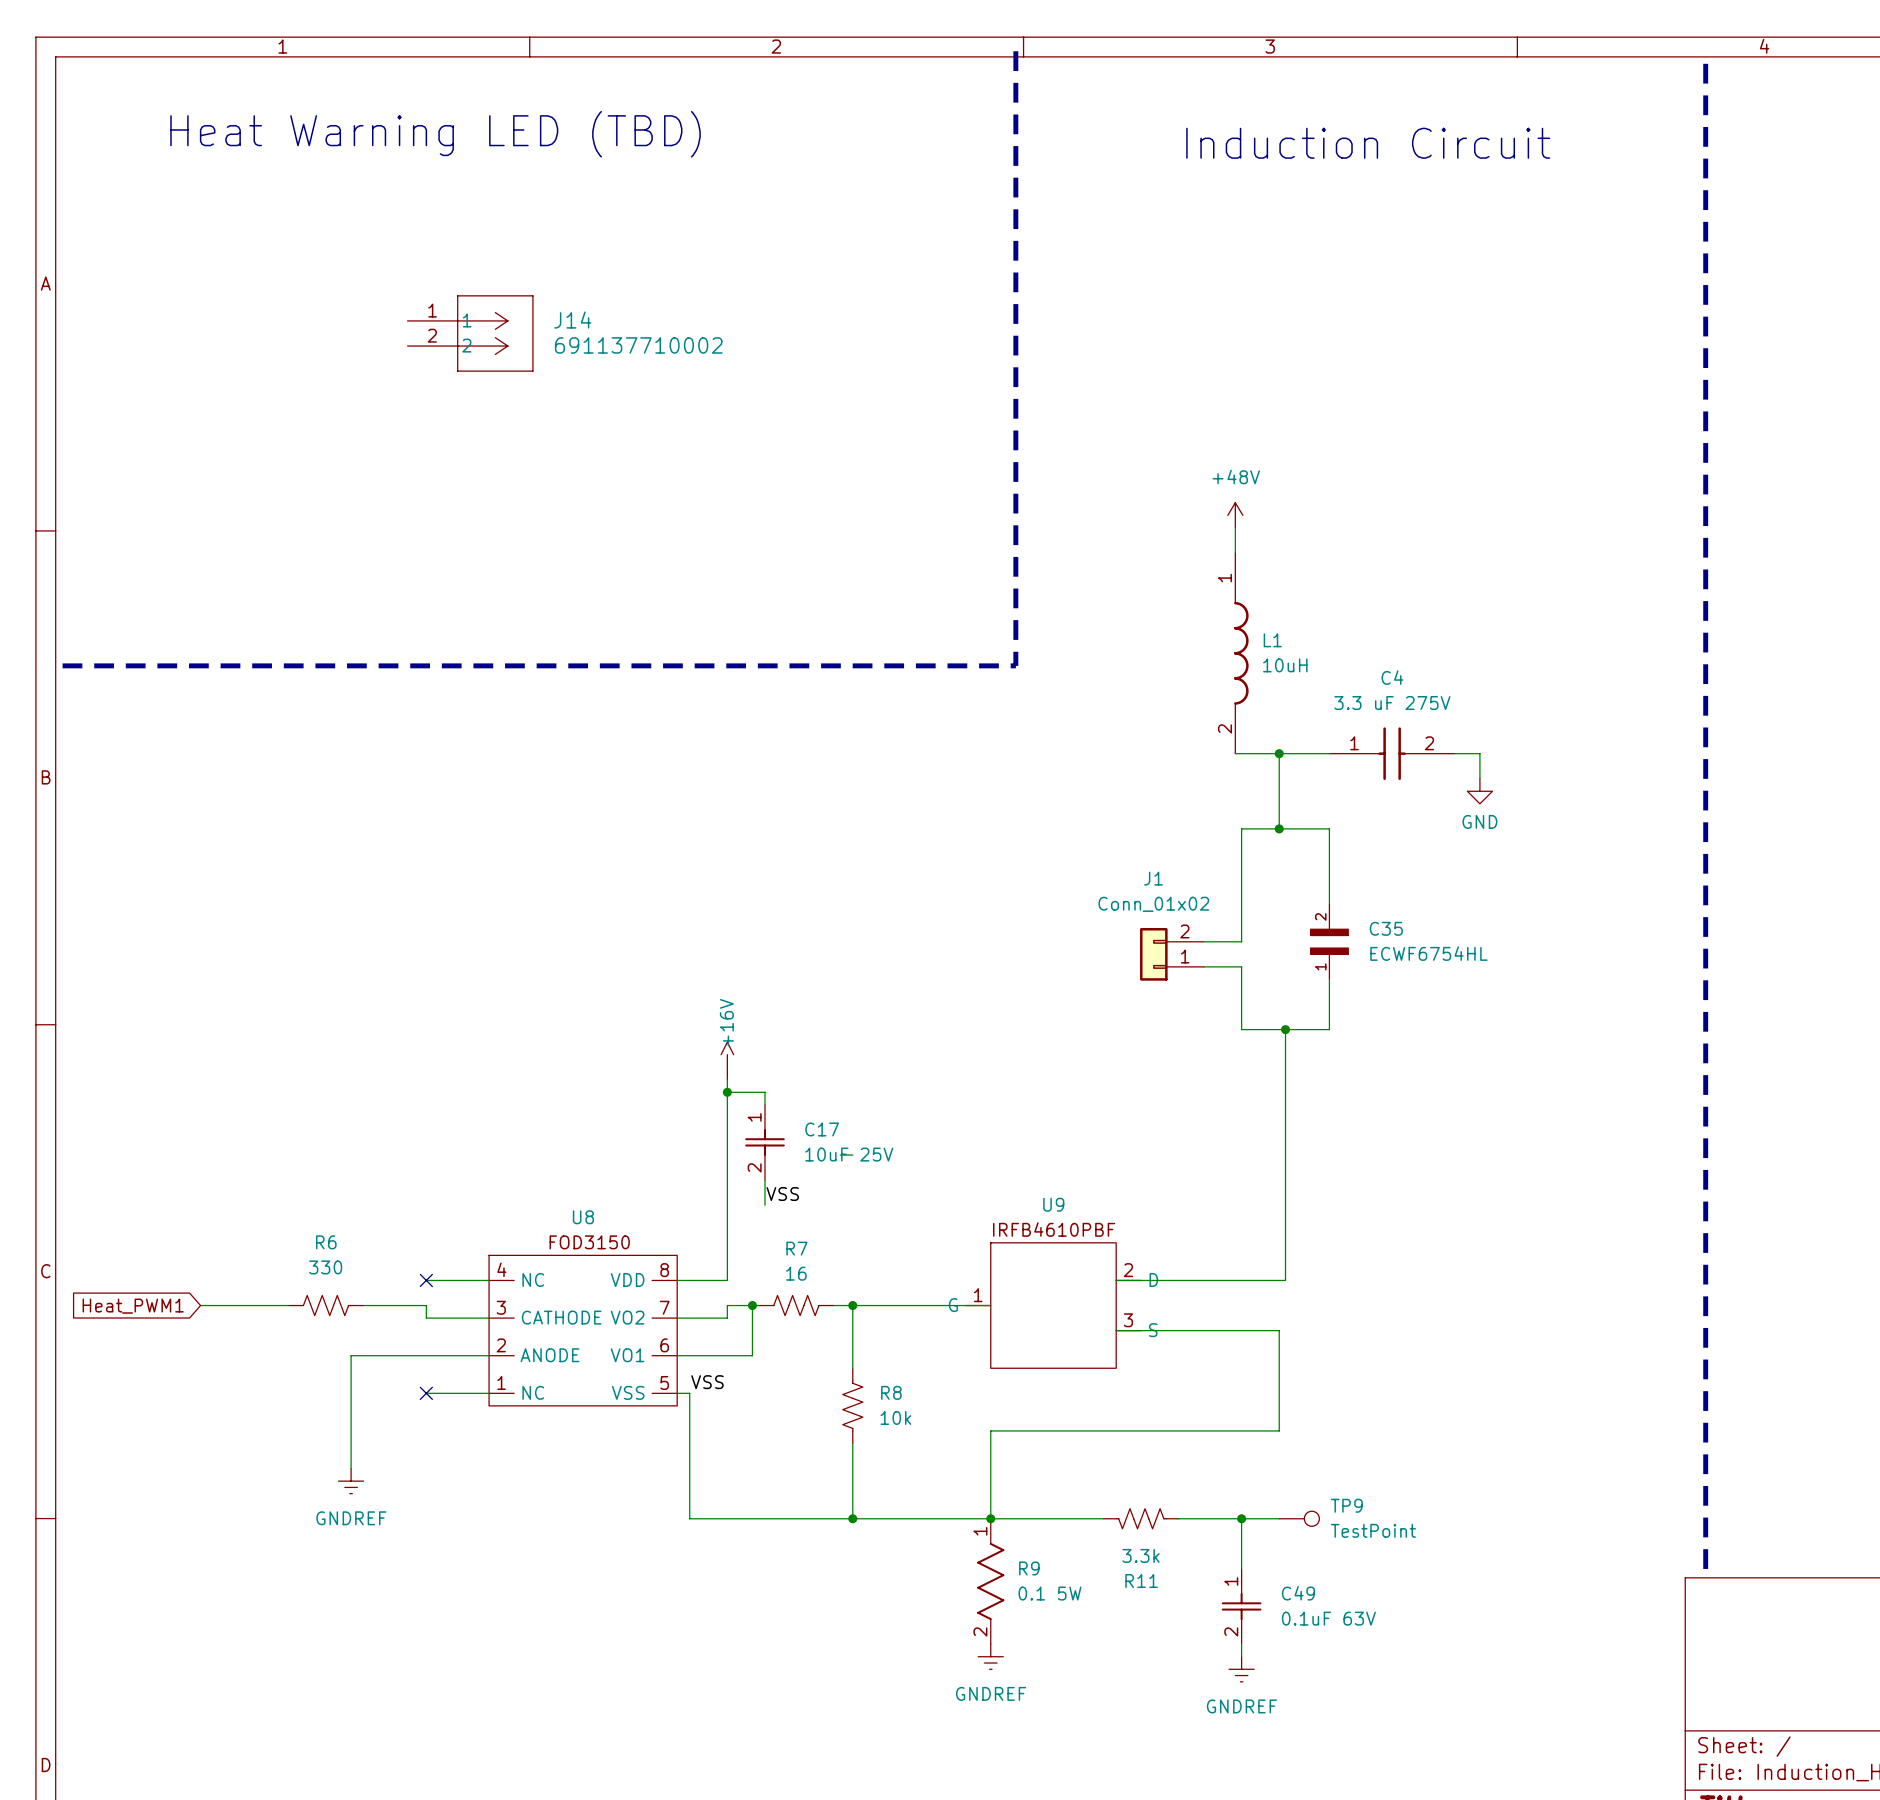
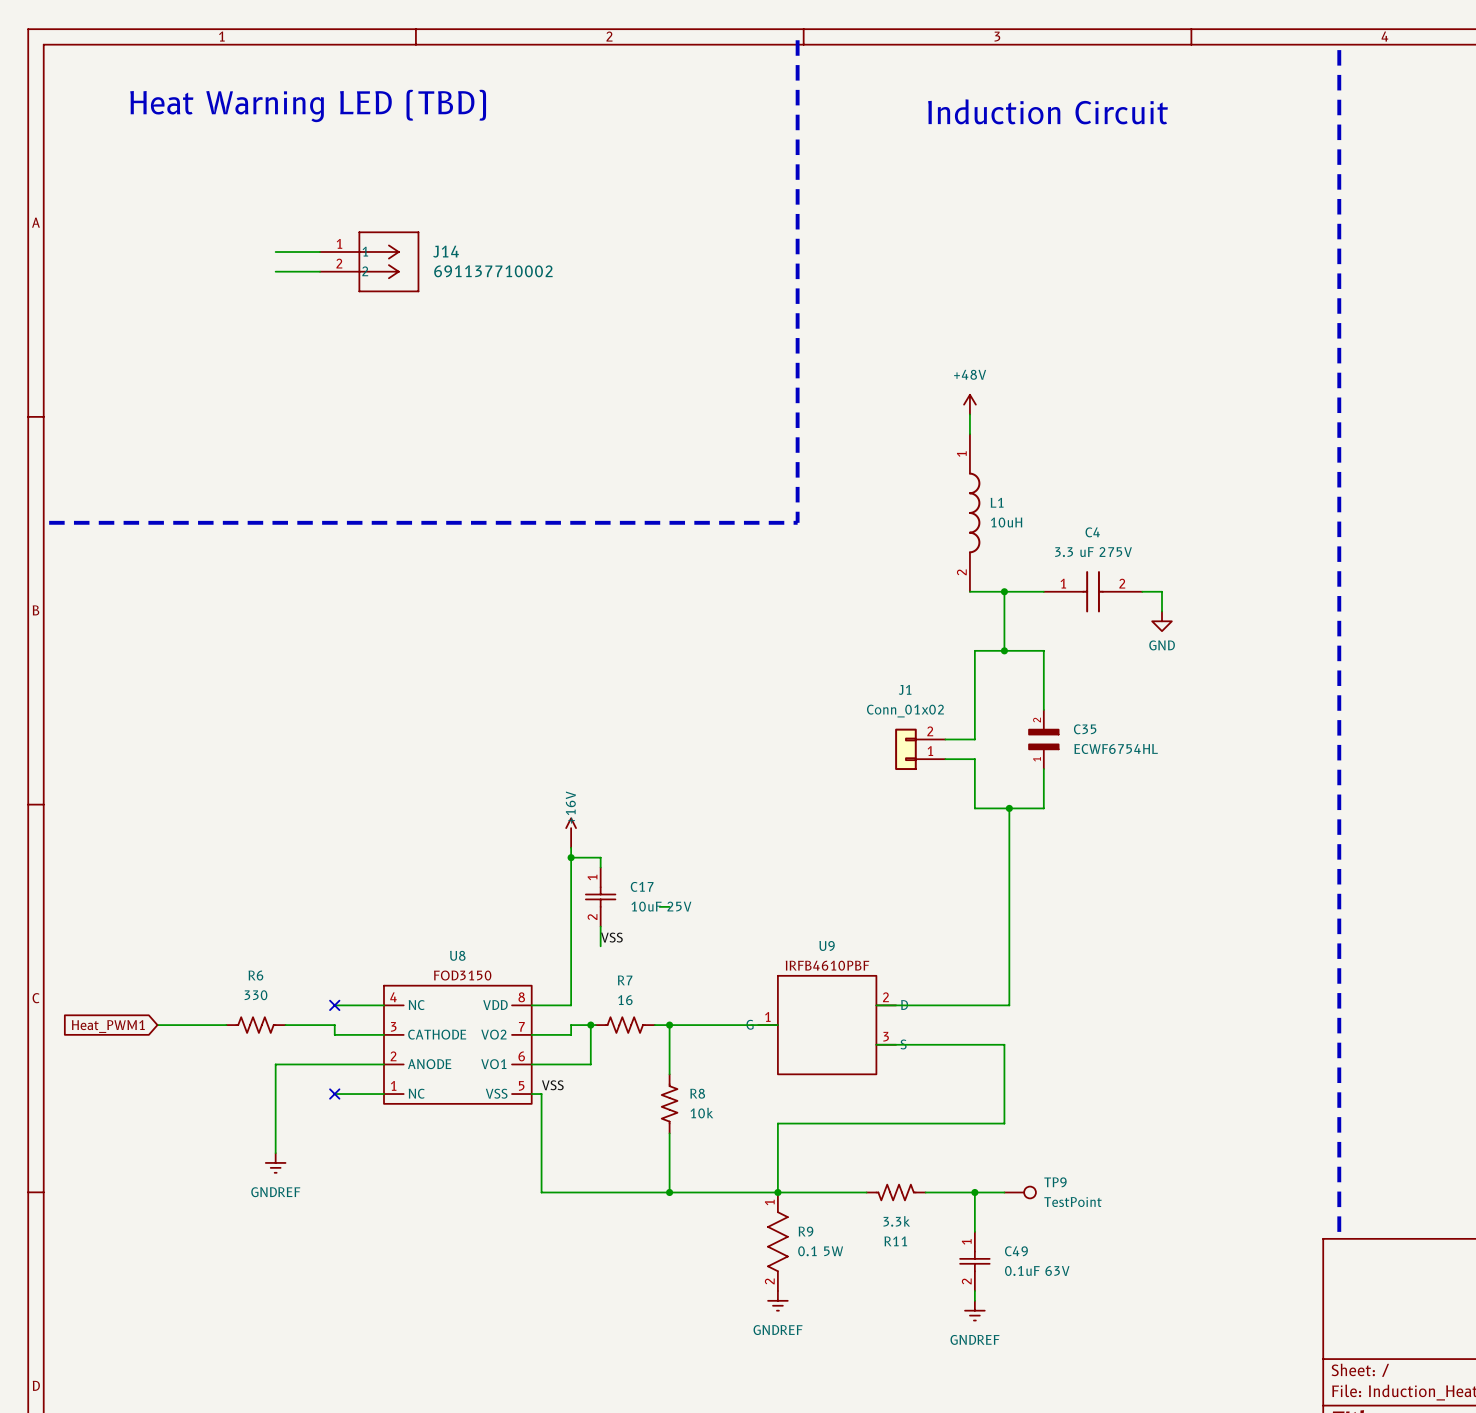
wire: none -> (275, 251) (319, 251)
wire: none -> (275, 271) (319, 271)

